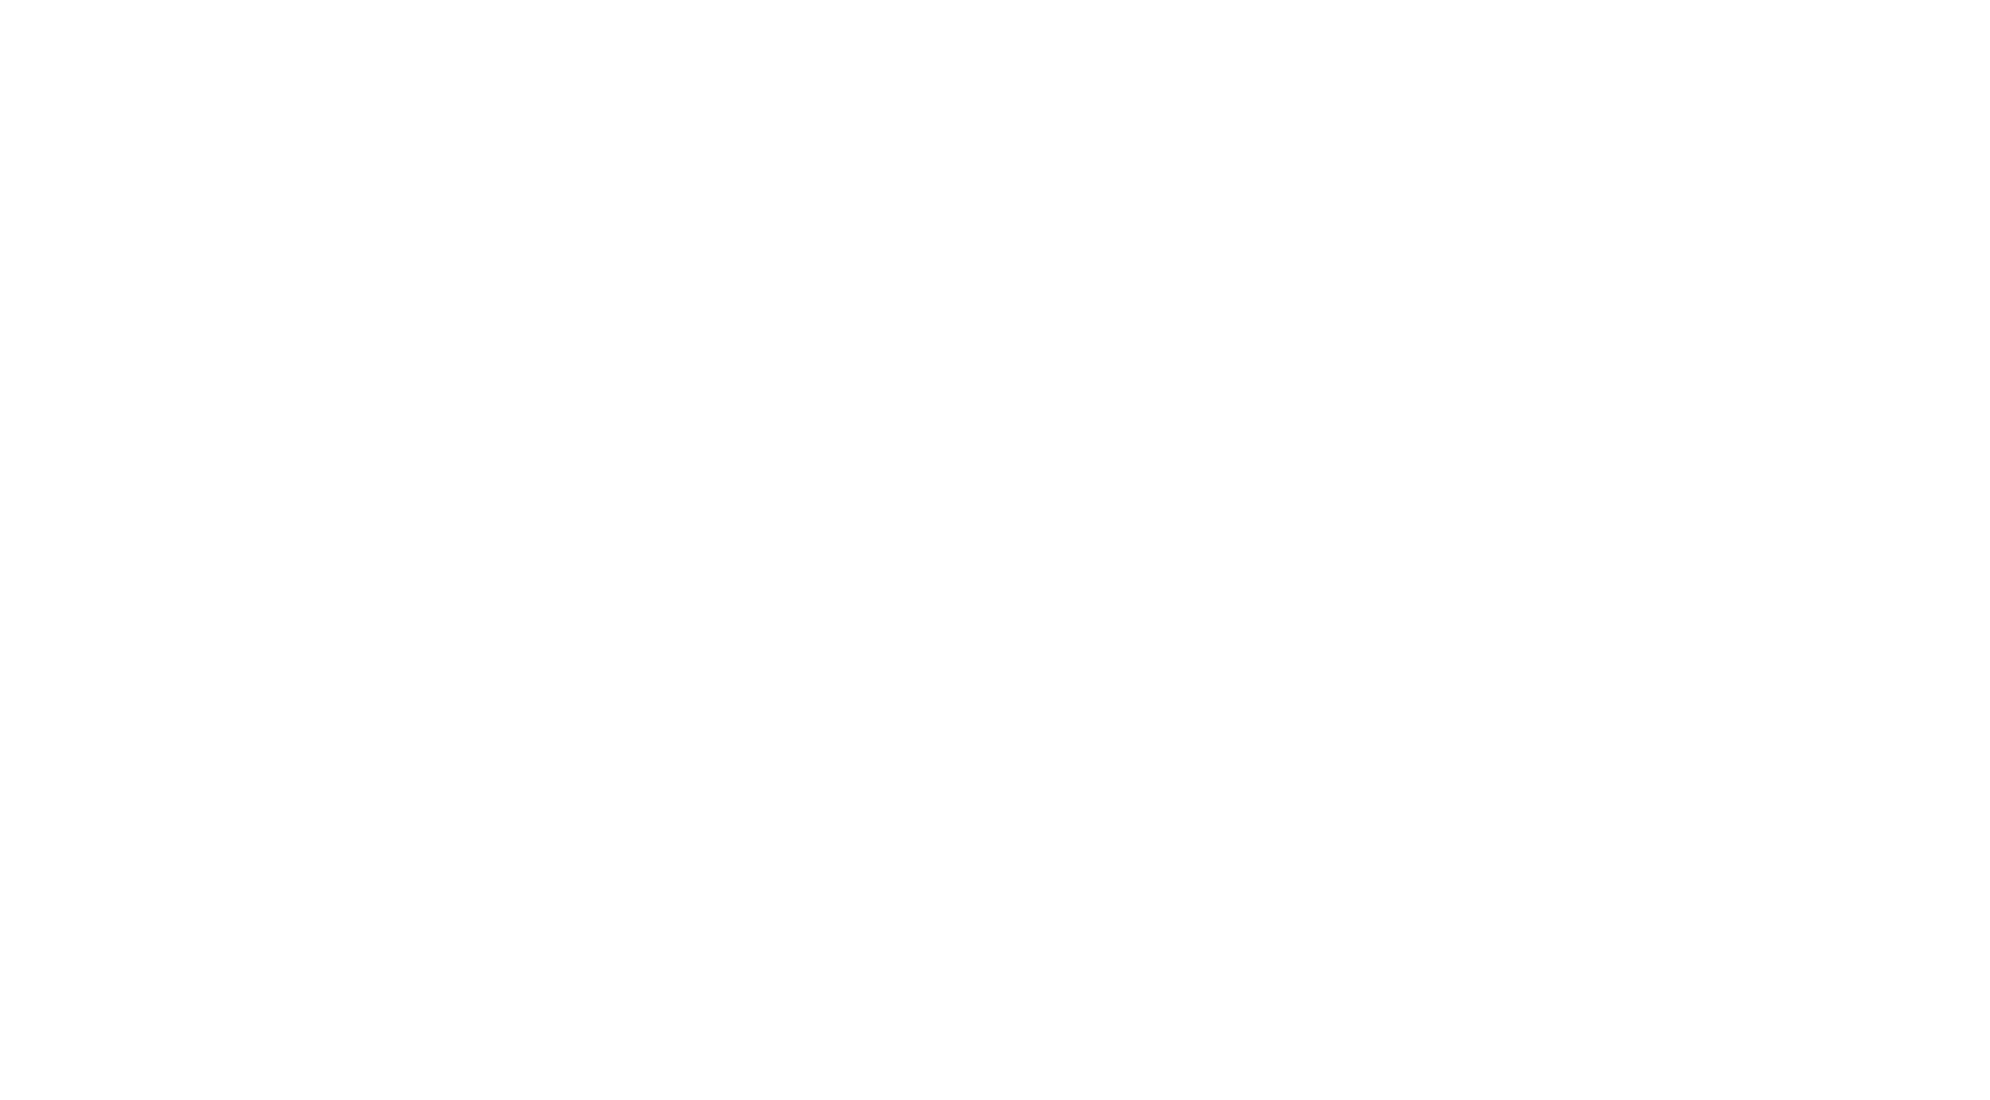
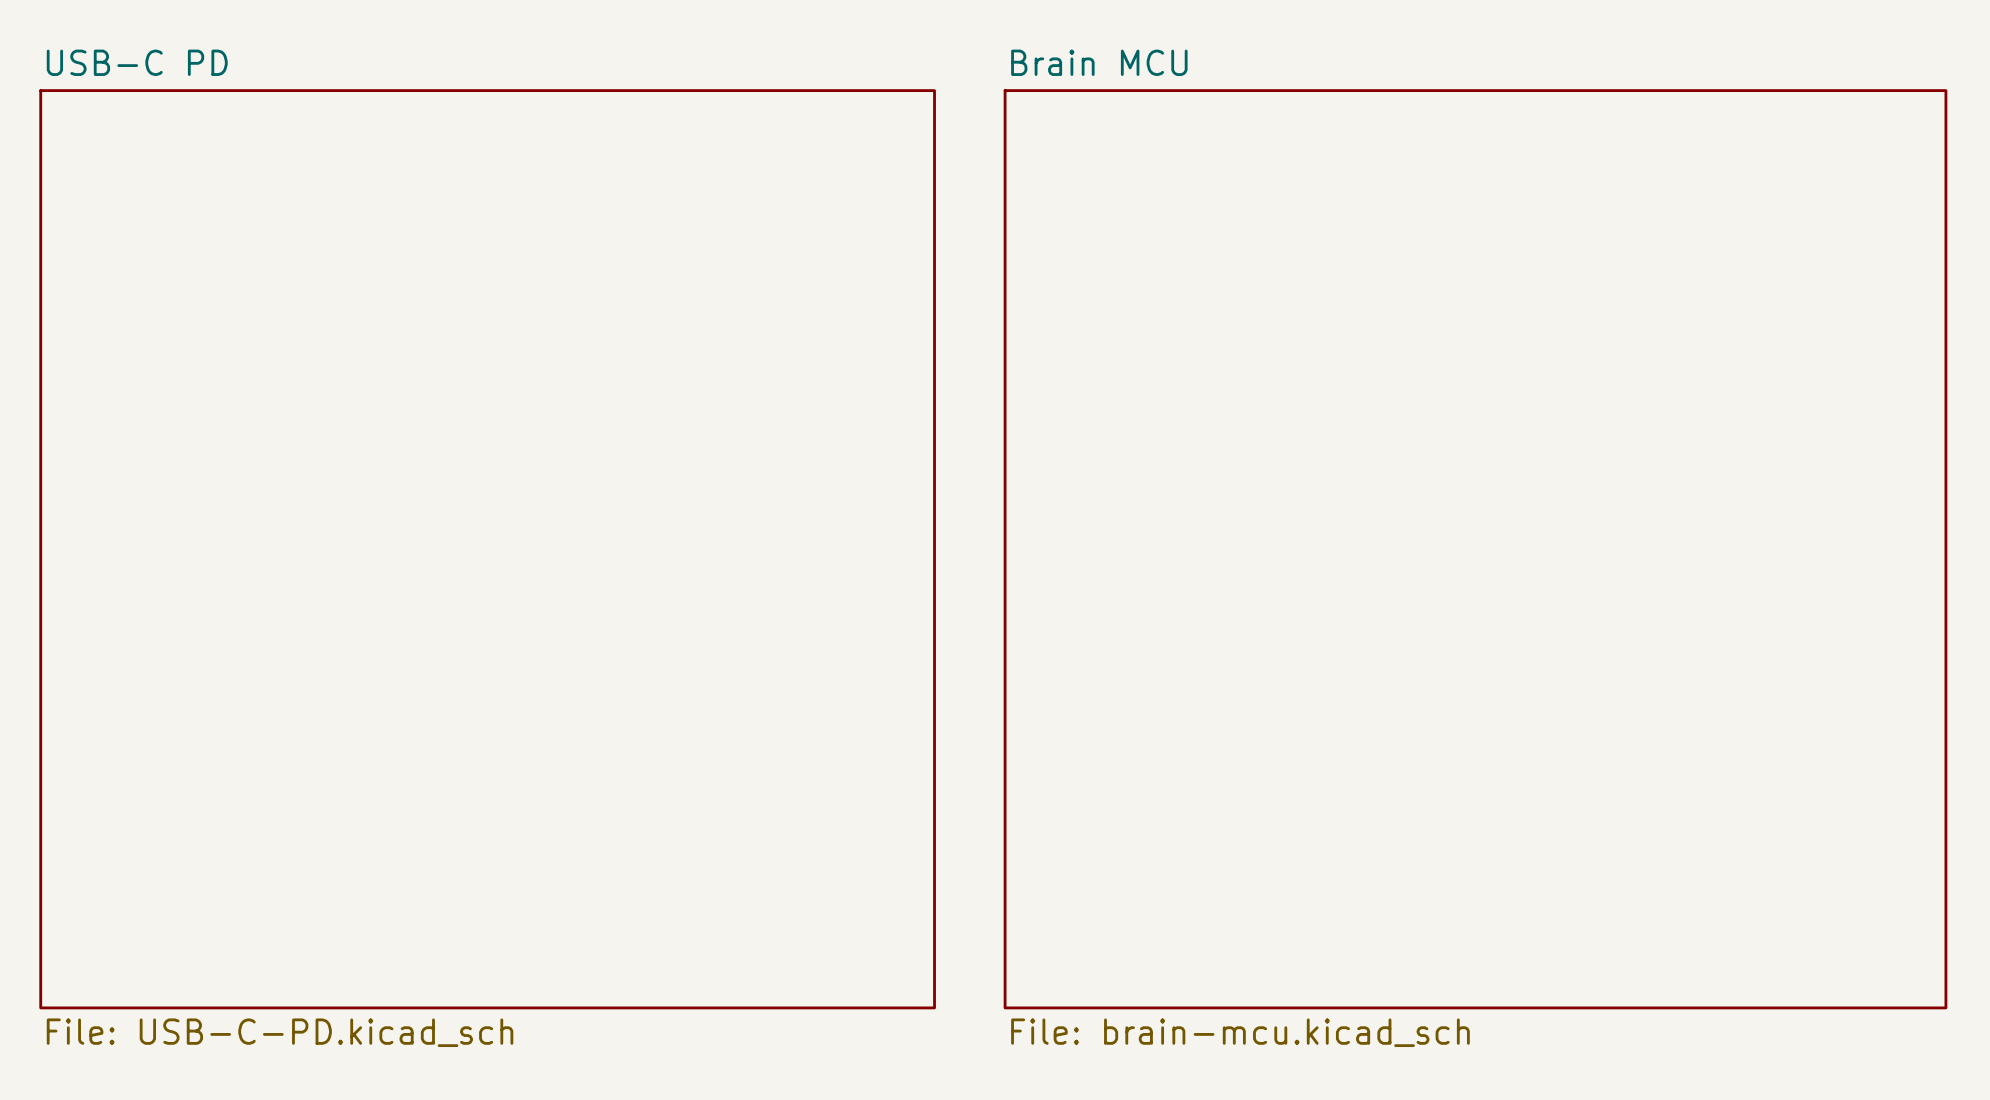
sheet USB-C PD: none -> File: USB-C-PD.kicad_sch (487, 549)
sheet Brain MCU: none -> File: brain-mcu.kicad_sch (1475, 549)

